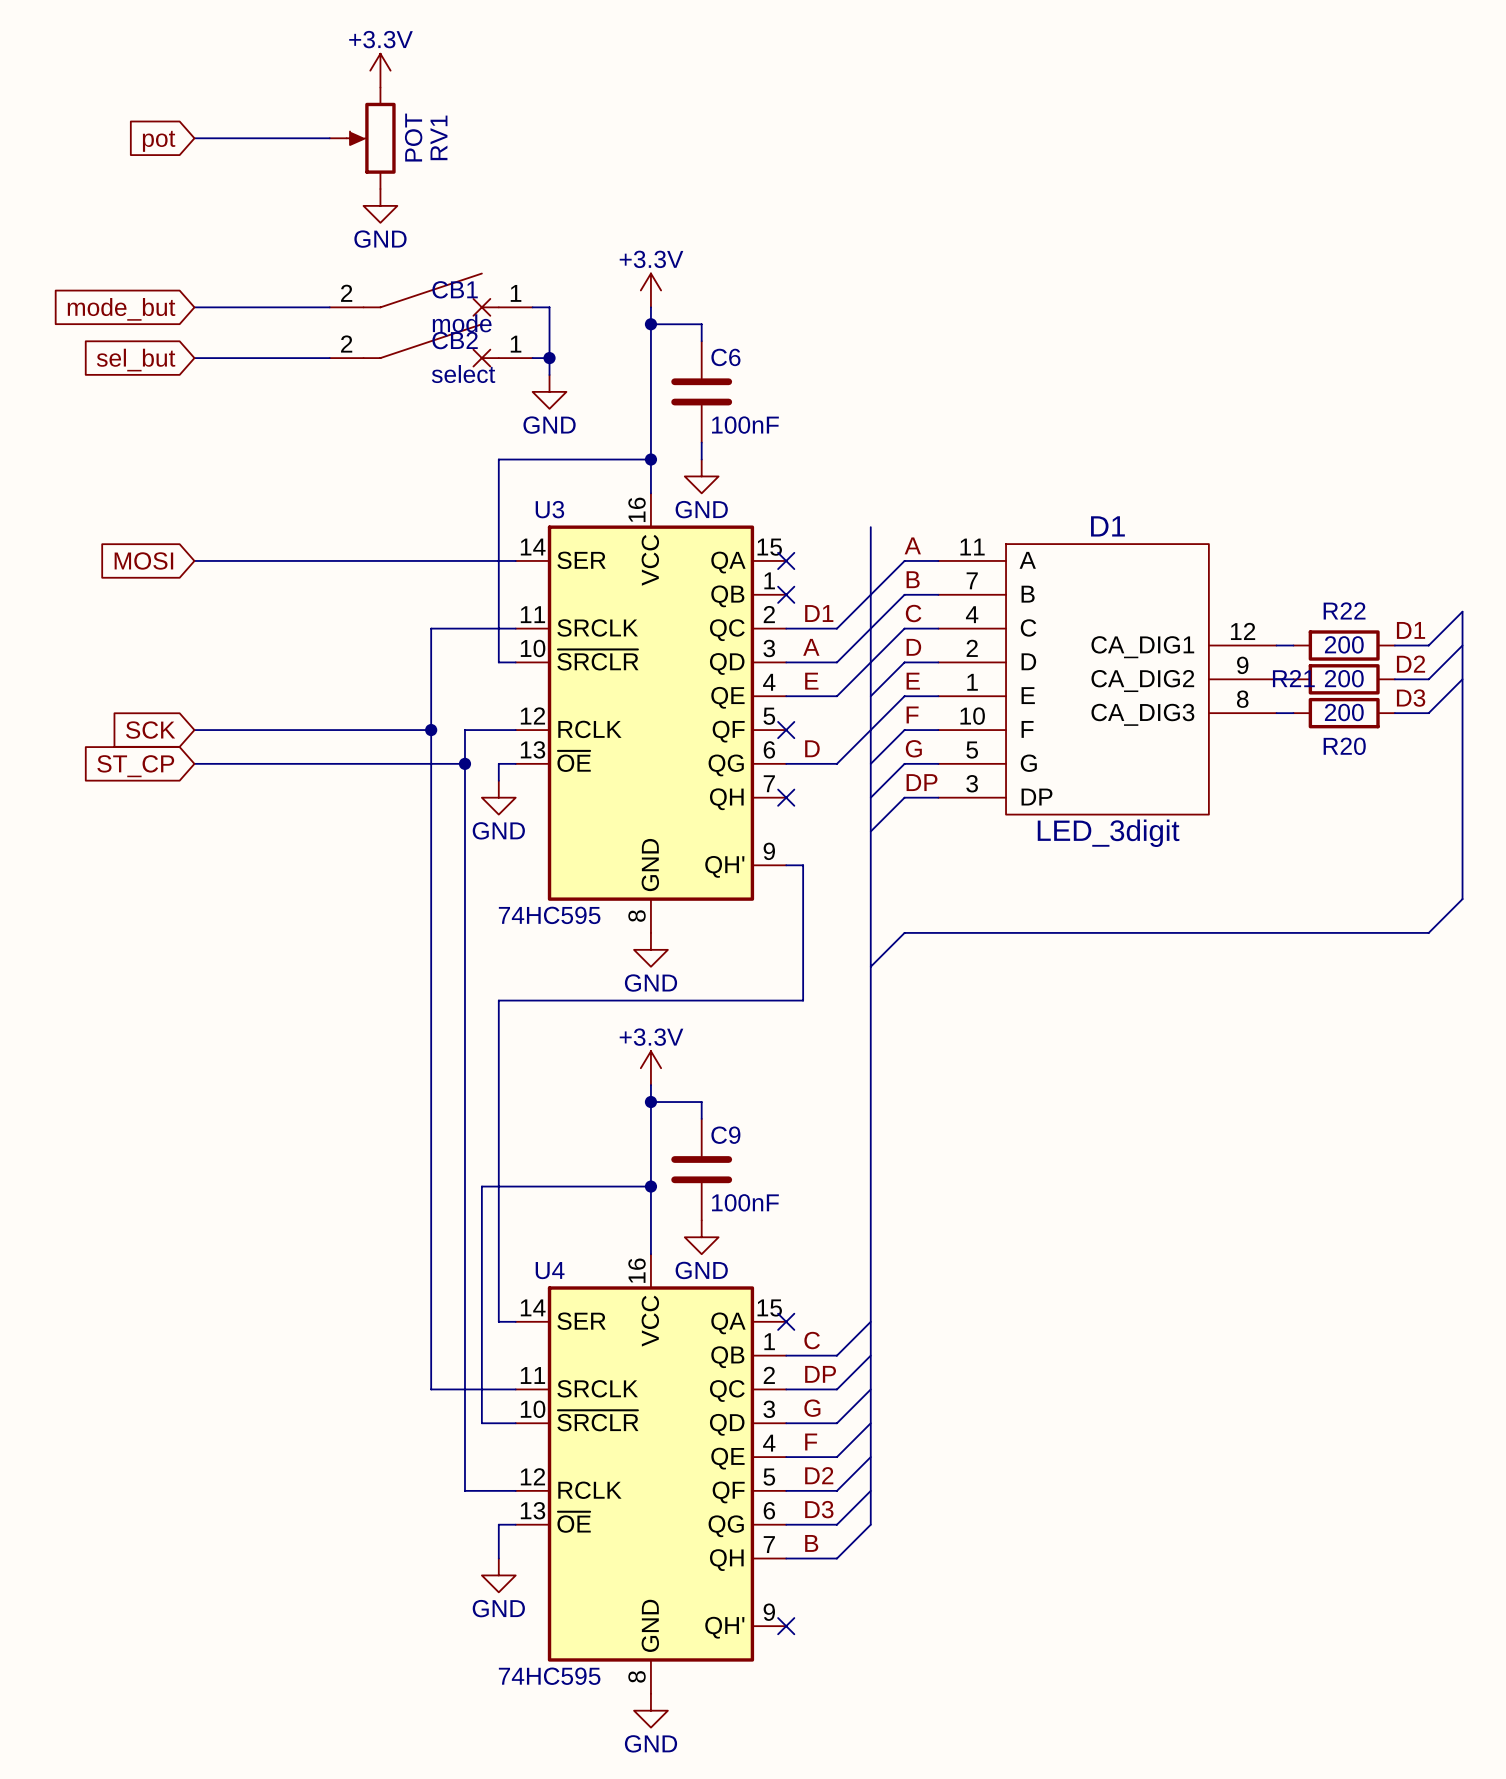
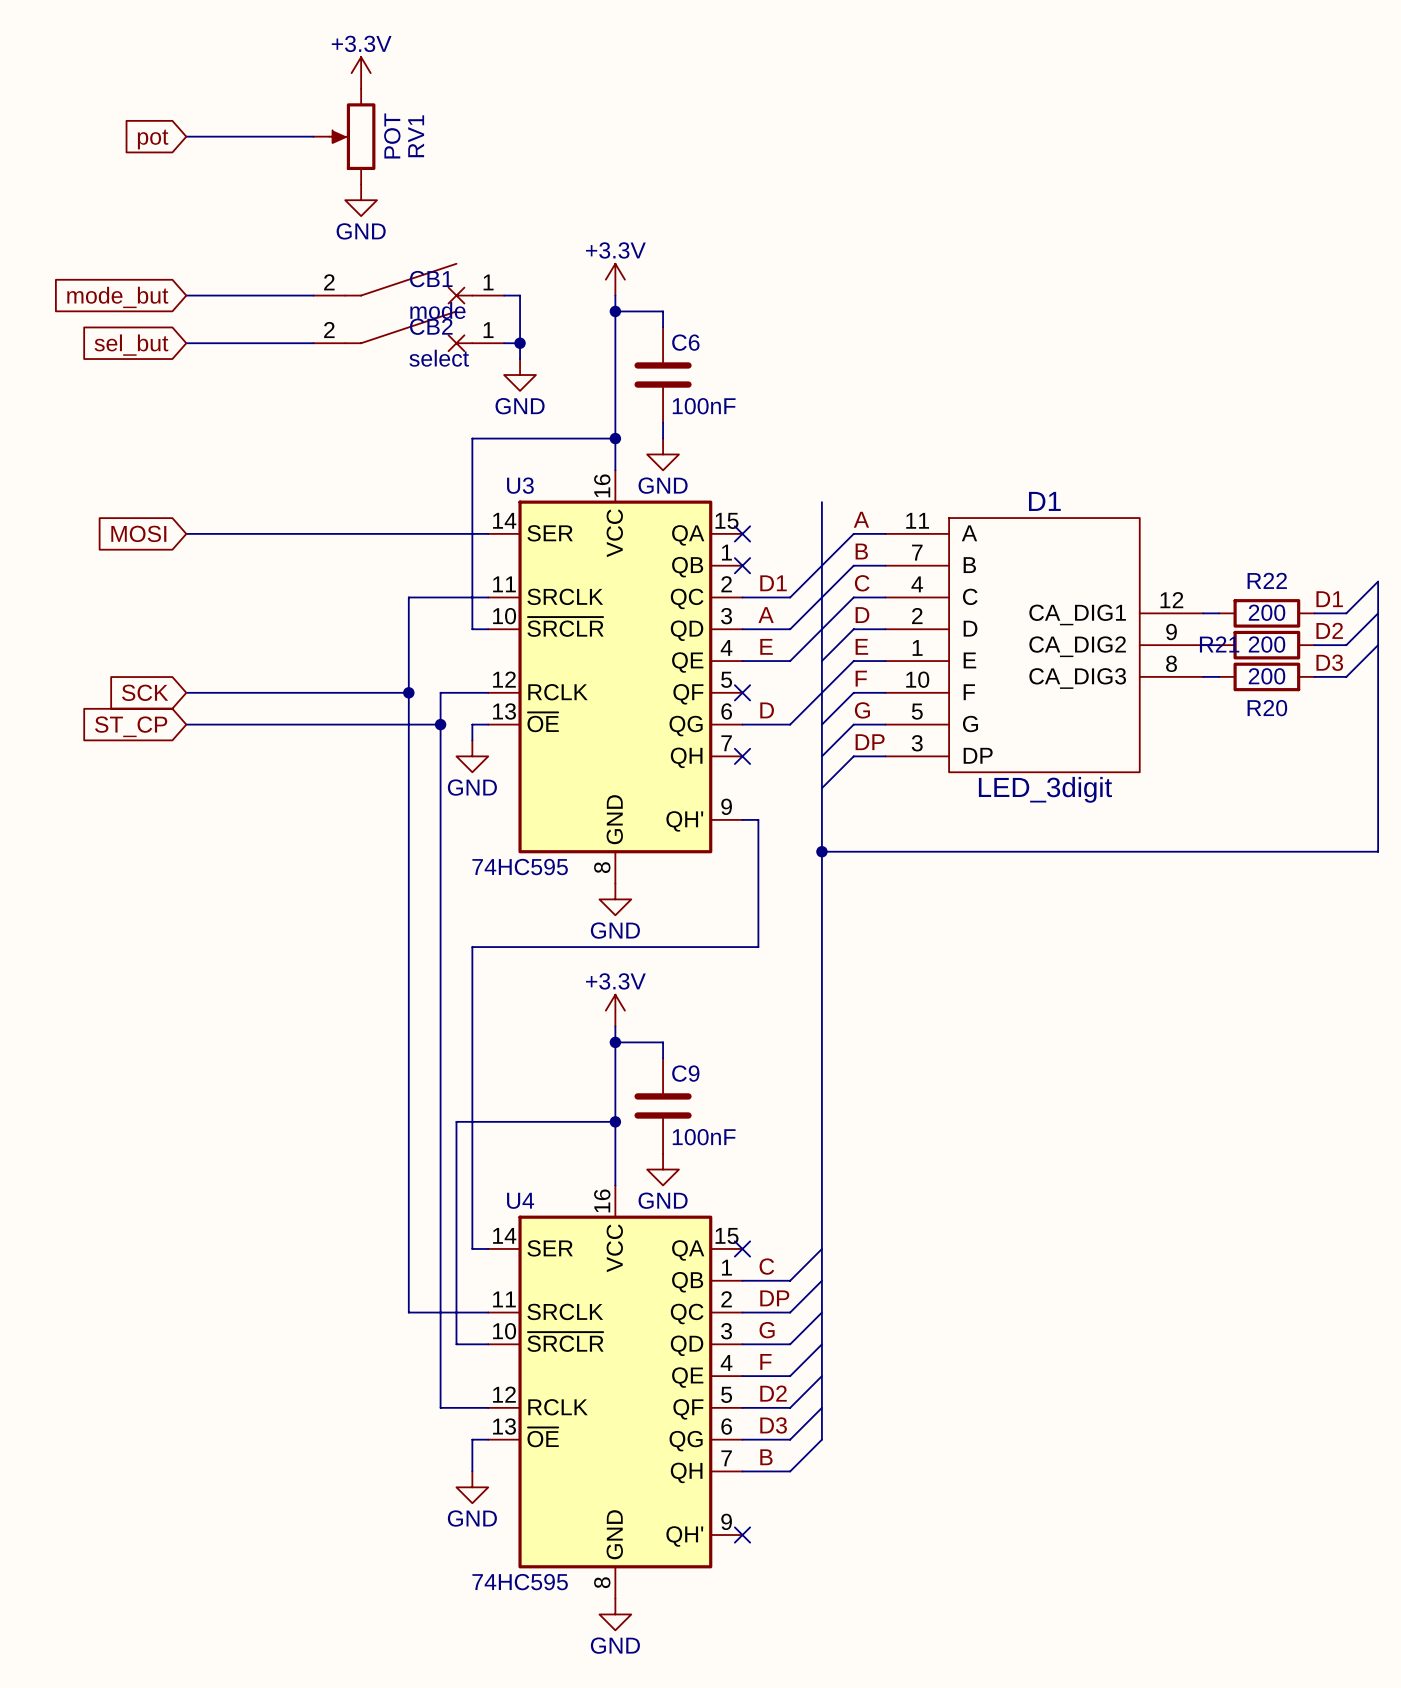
junction: none -> (821, 851)
bus: (1462, 899) (1428, 932) (904, 932) (870, 966) -> (1378, 851) (821, 851)

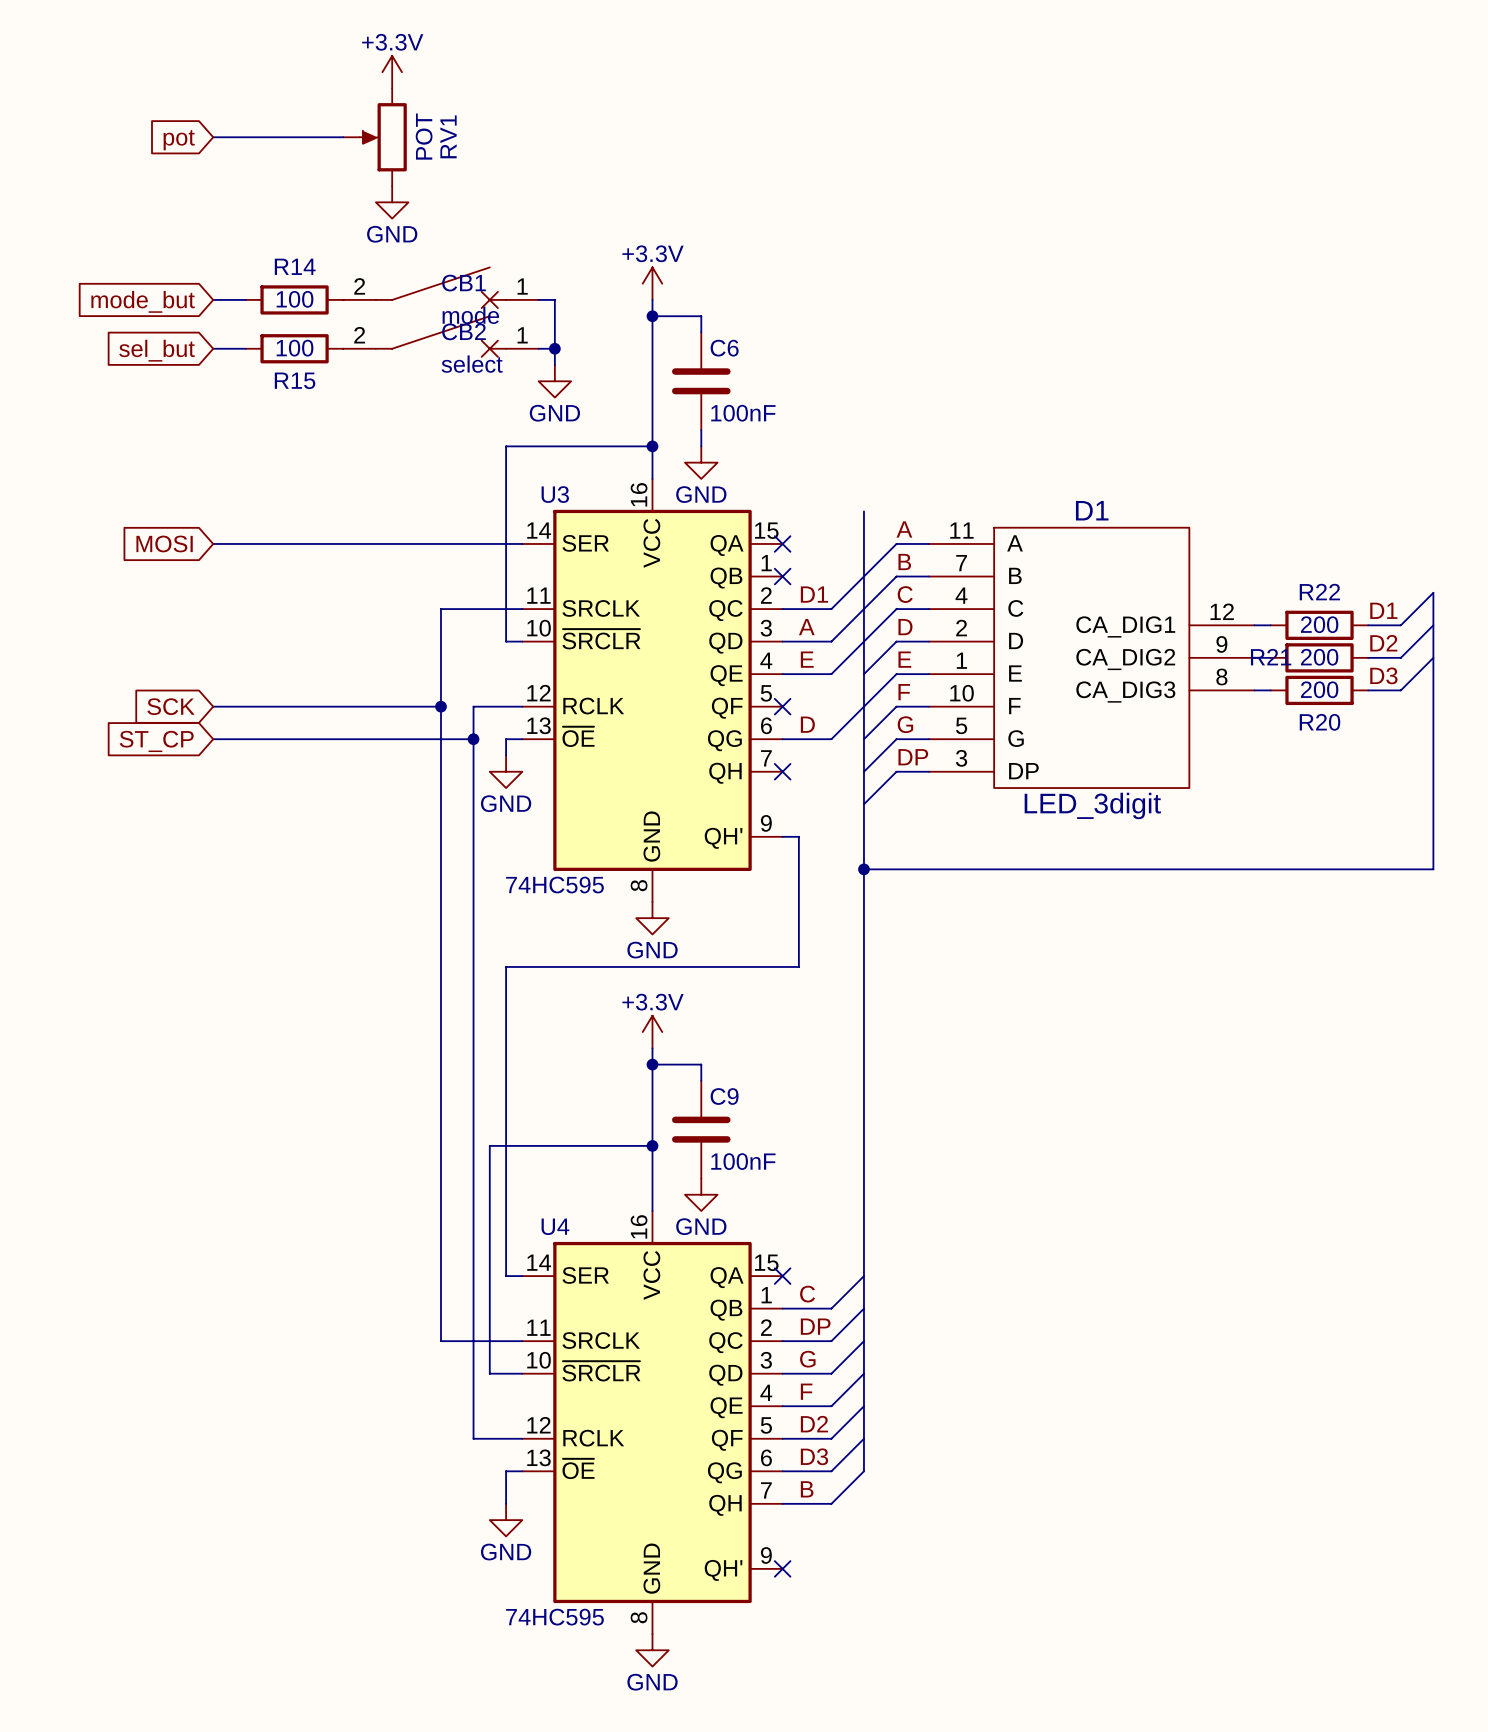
wire: (218, 295) (313, 295) -> none
R14: none -> 100 (294, 299)
wire: (218, 343) (313, 343) -> none
R15: none -> 100 (294, 348)

